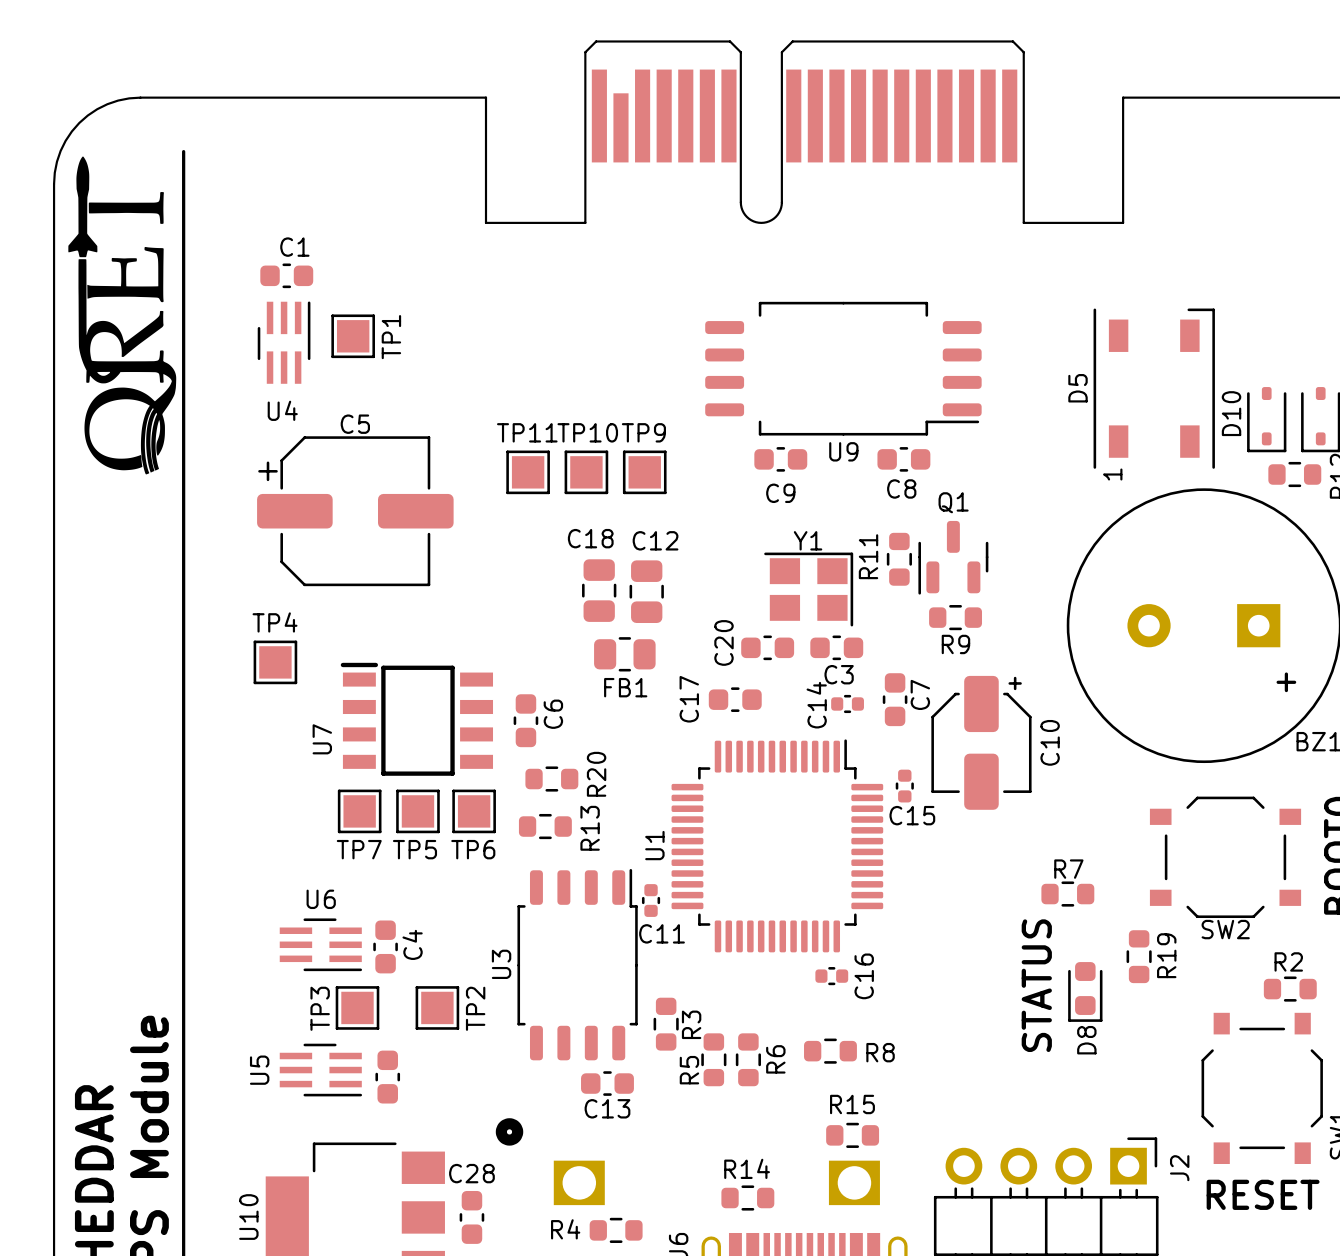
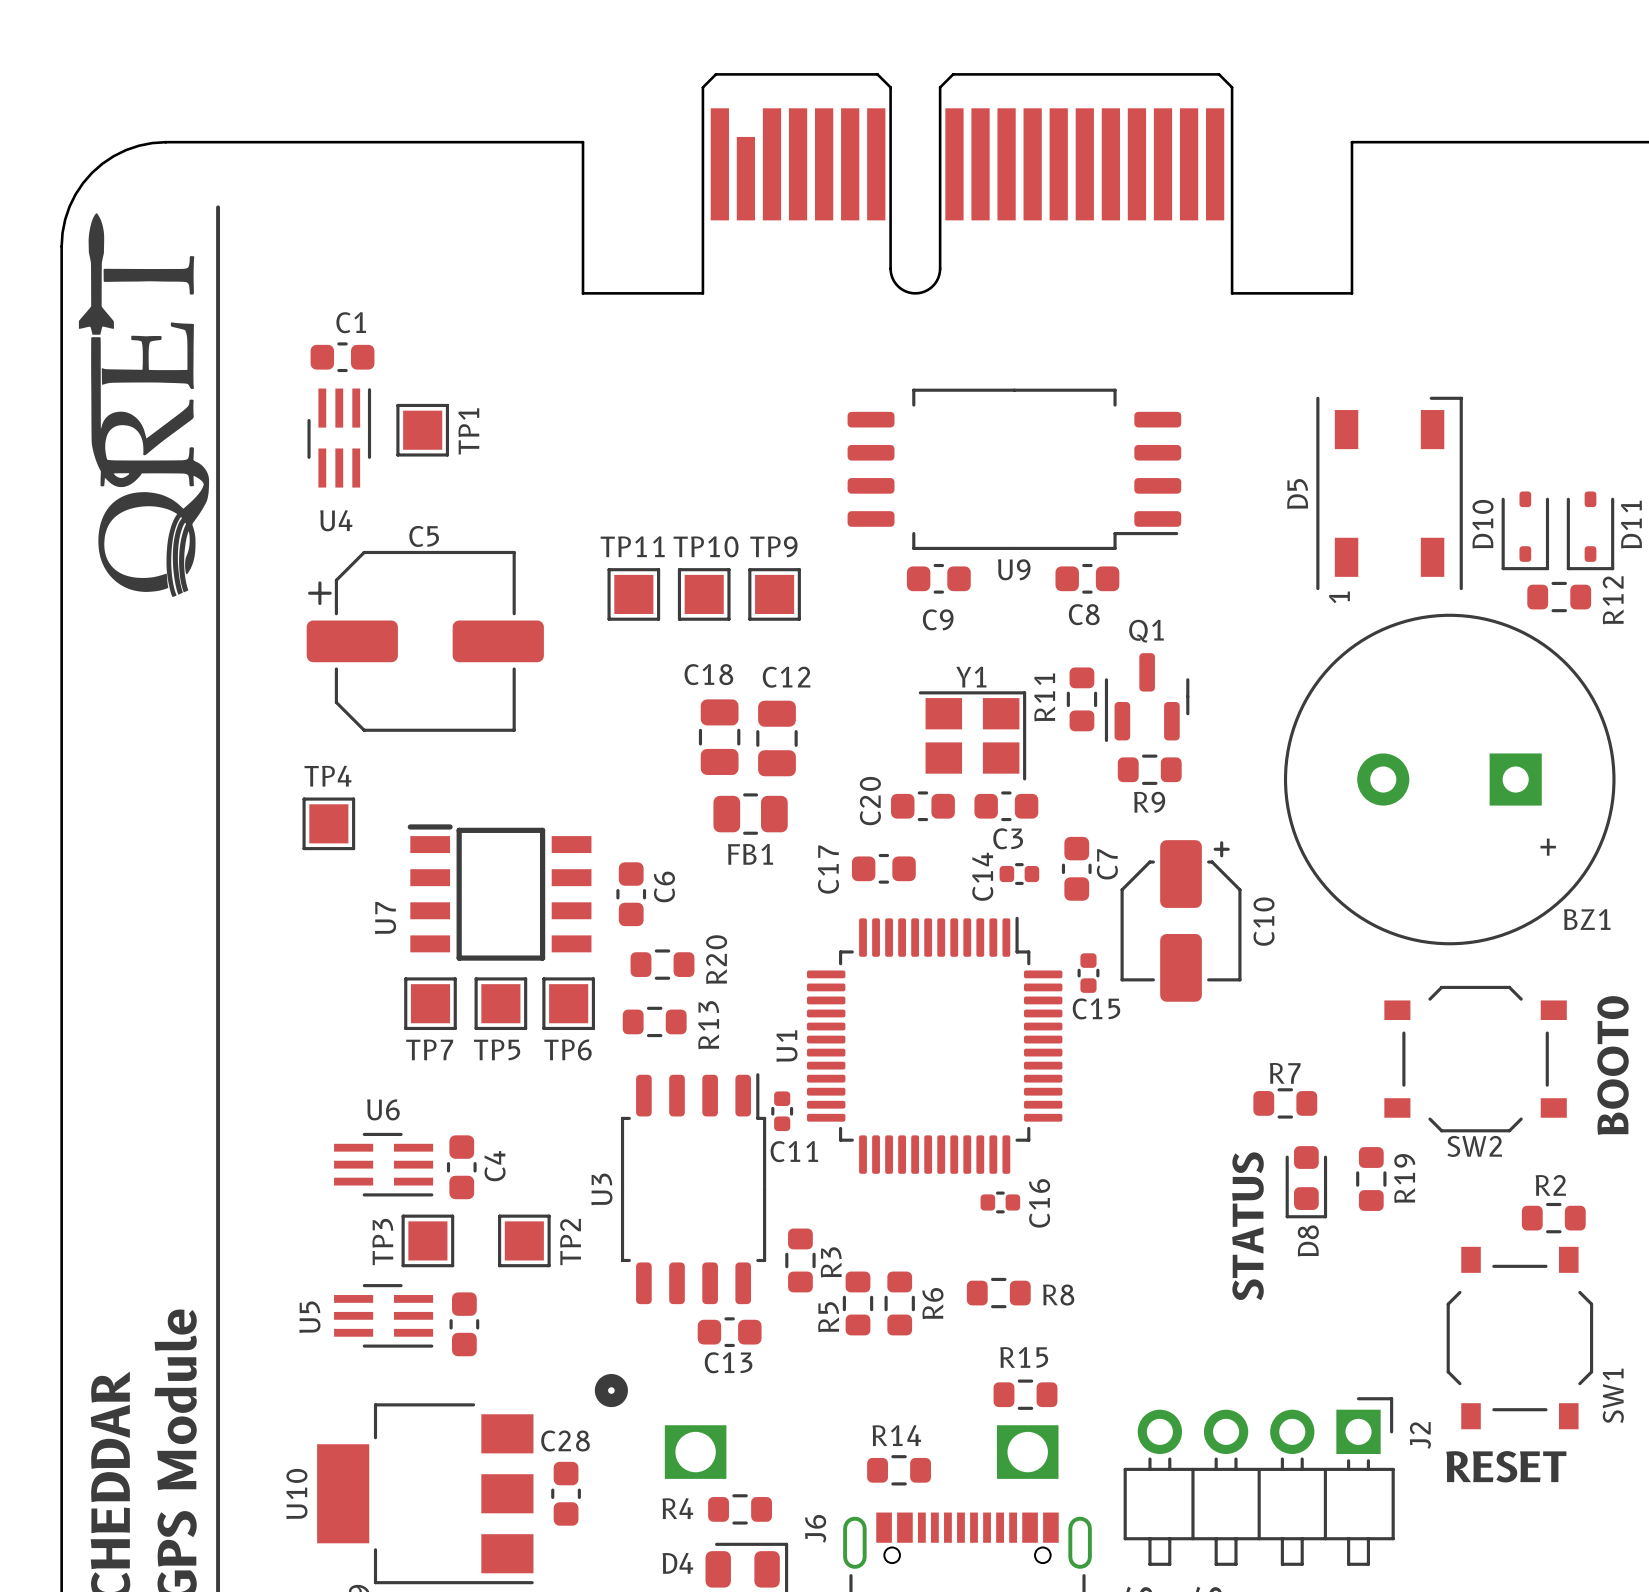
D8 position: (1085, 991) -> (1306, 1182)

